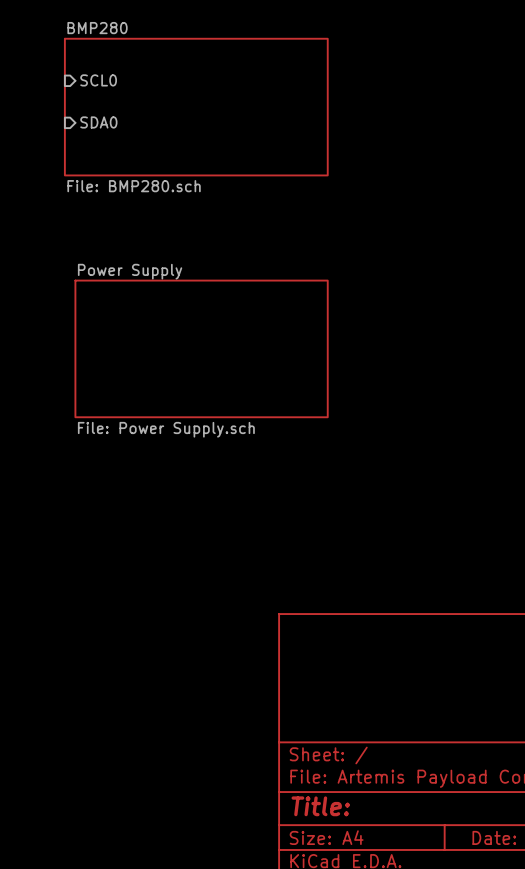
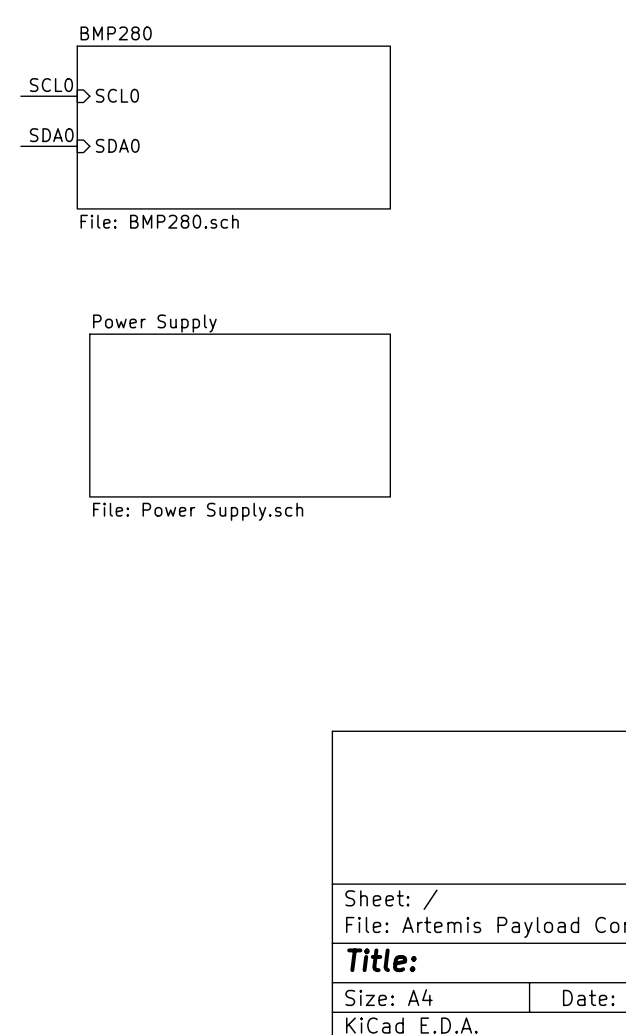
label: none -> SCL0 (51, 85)
wire: none -> (20, 96) (77, 96)
label: none -> SDA0 (51, 135)
wire: none -> (20, 146) (77, 146)

